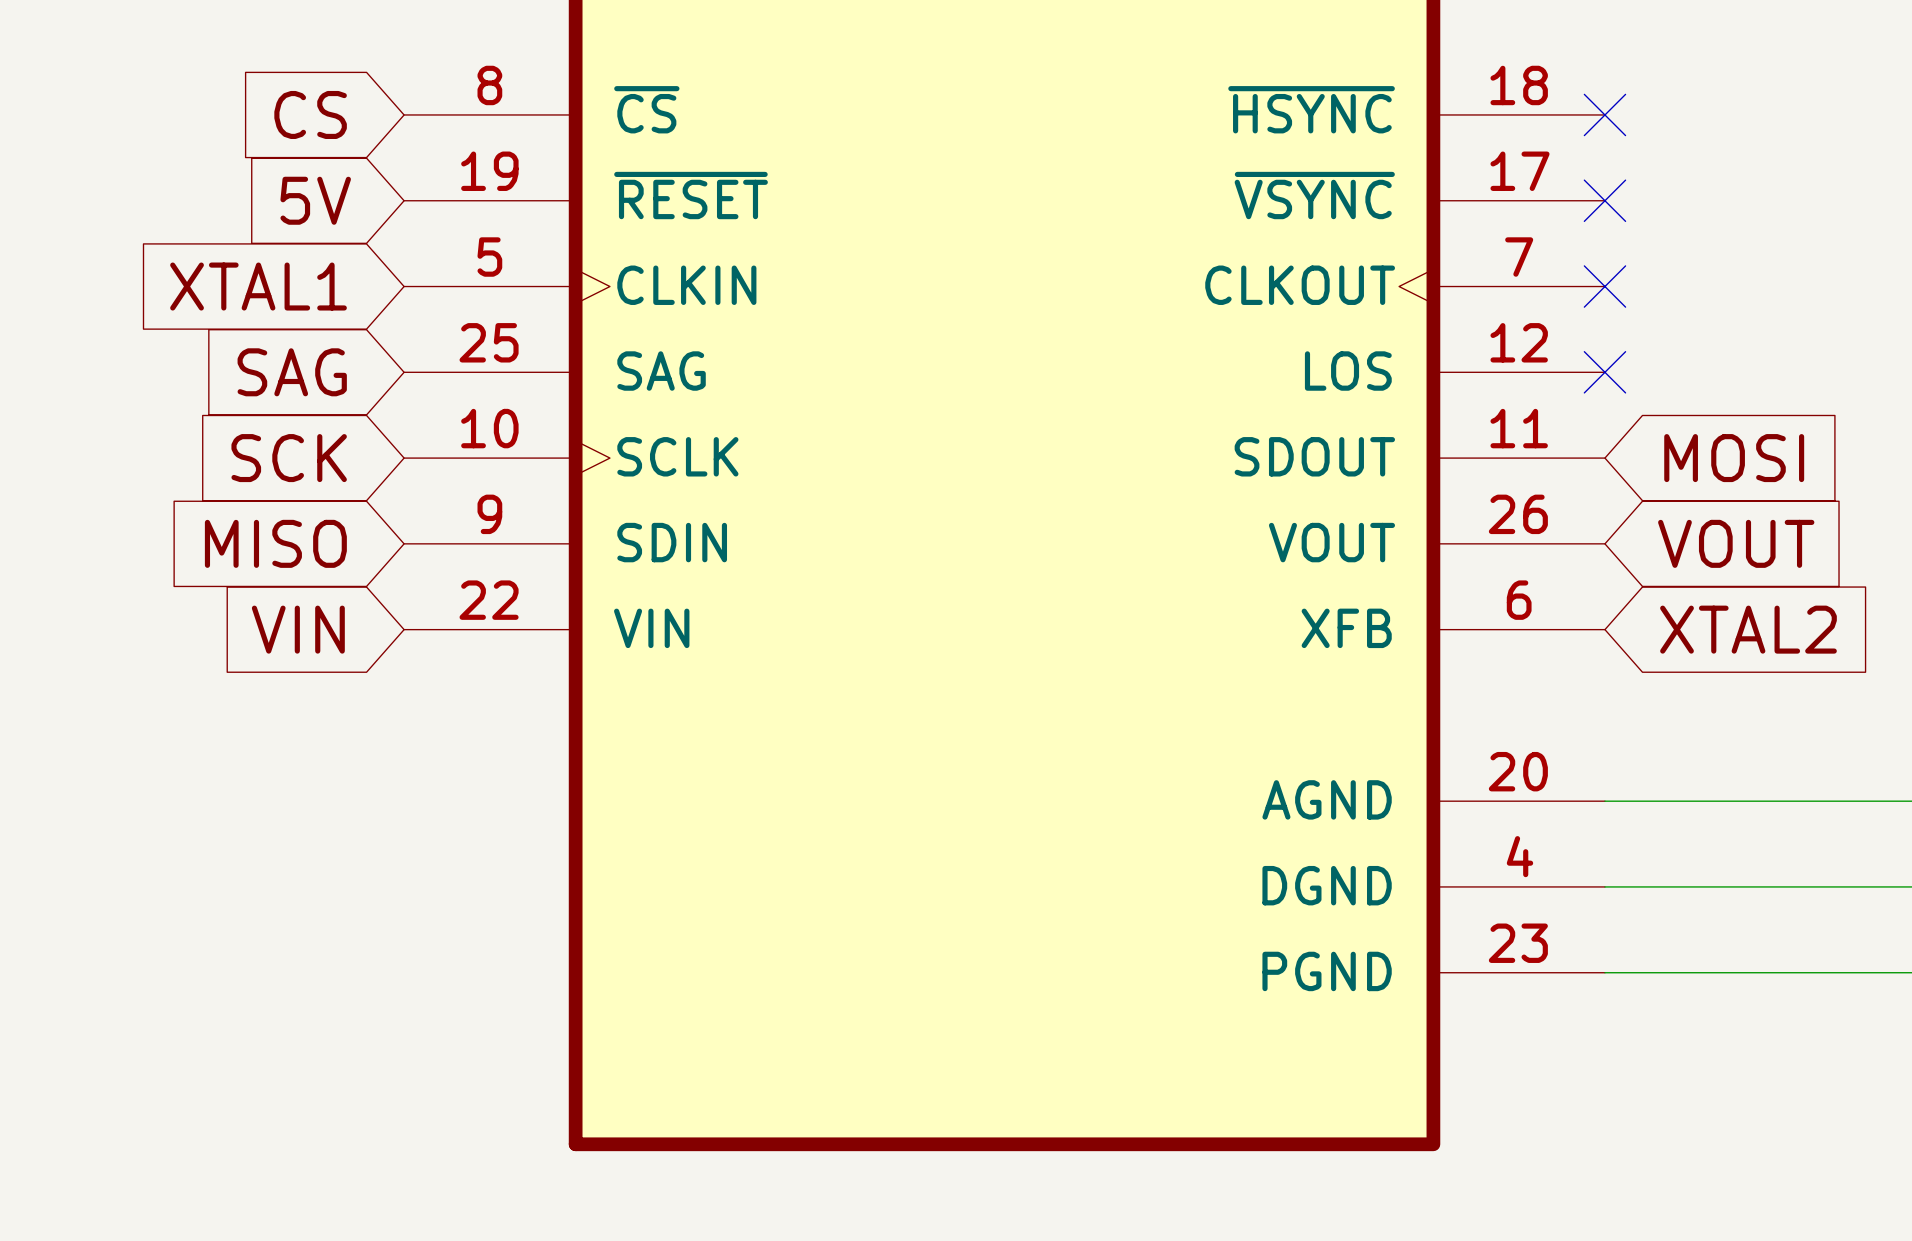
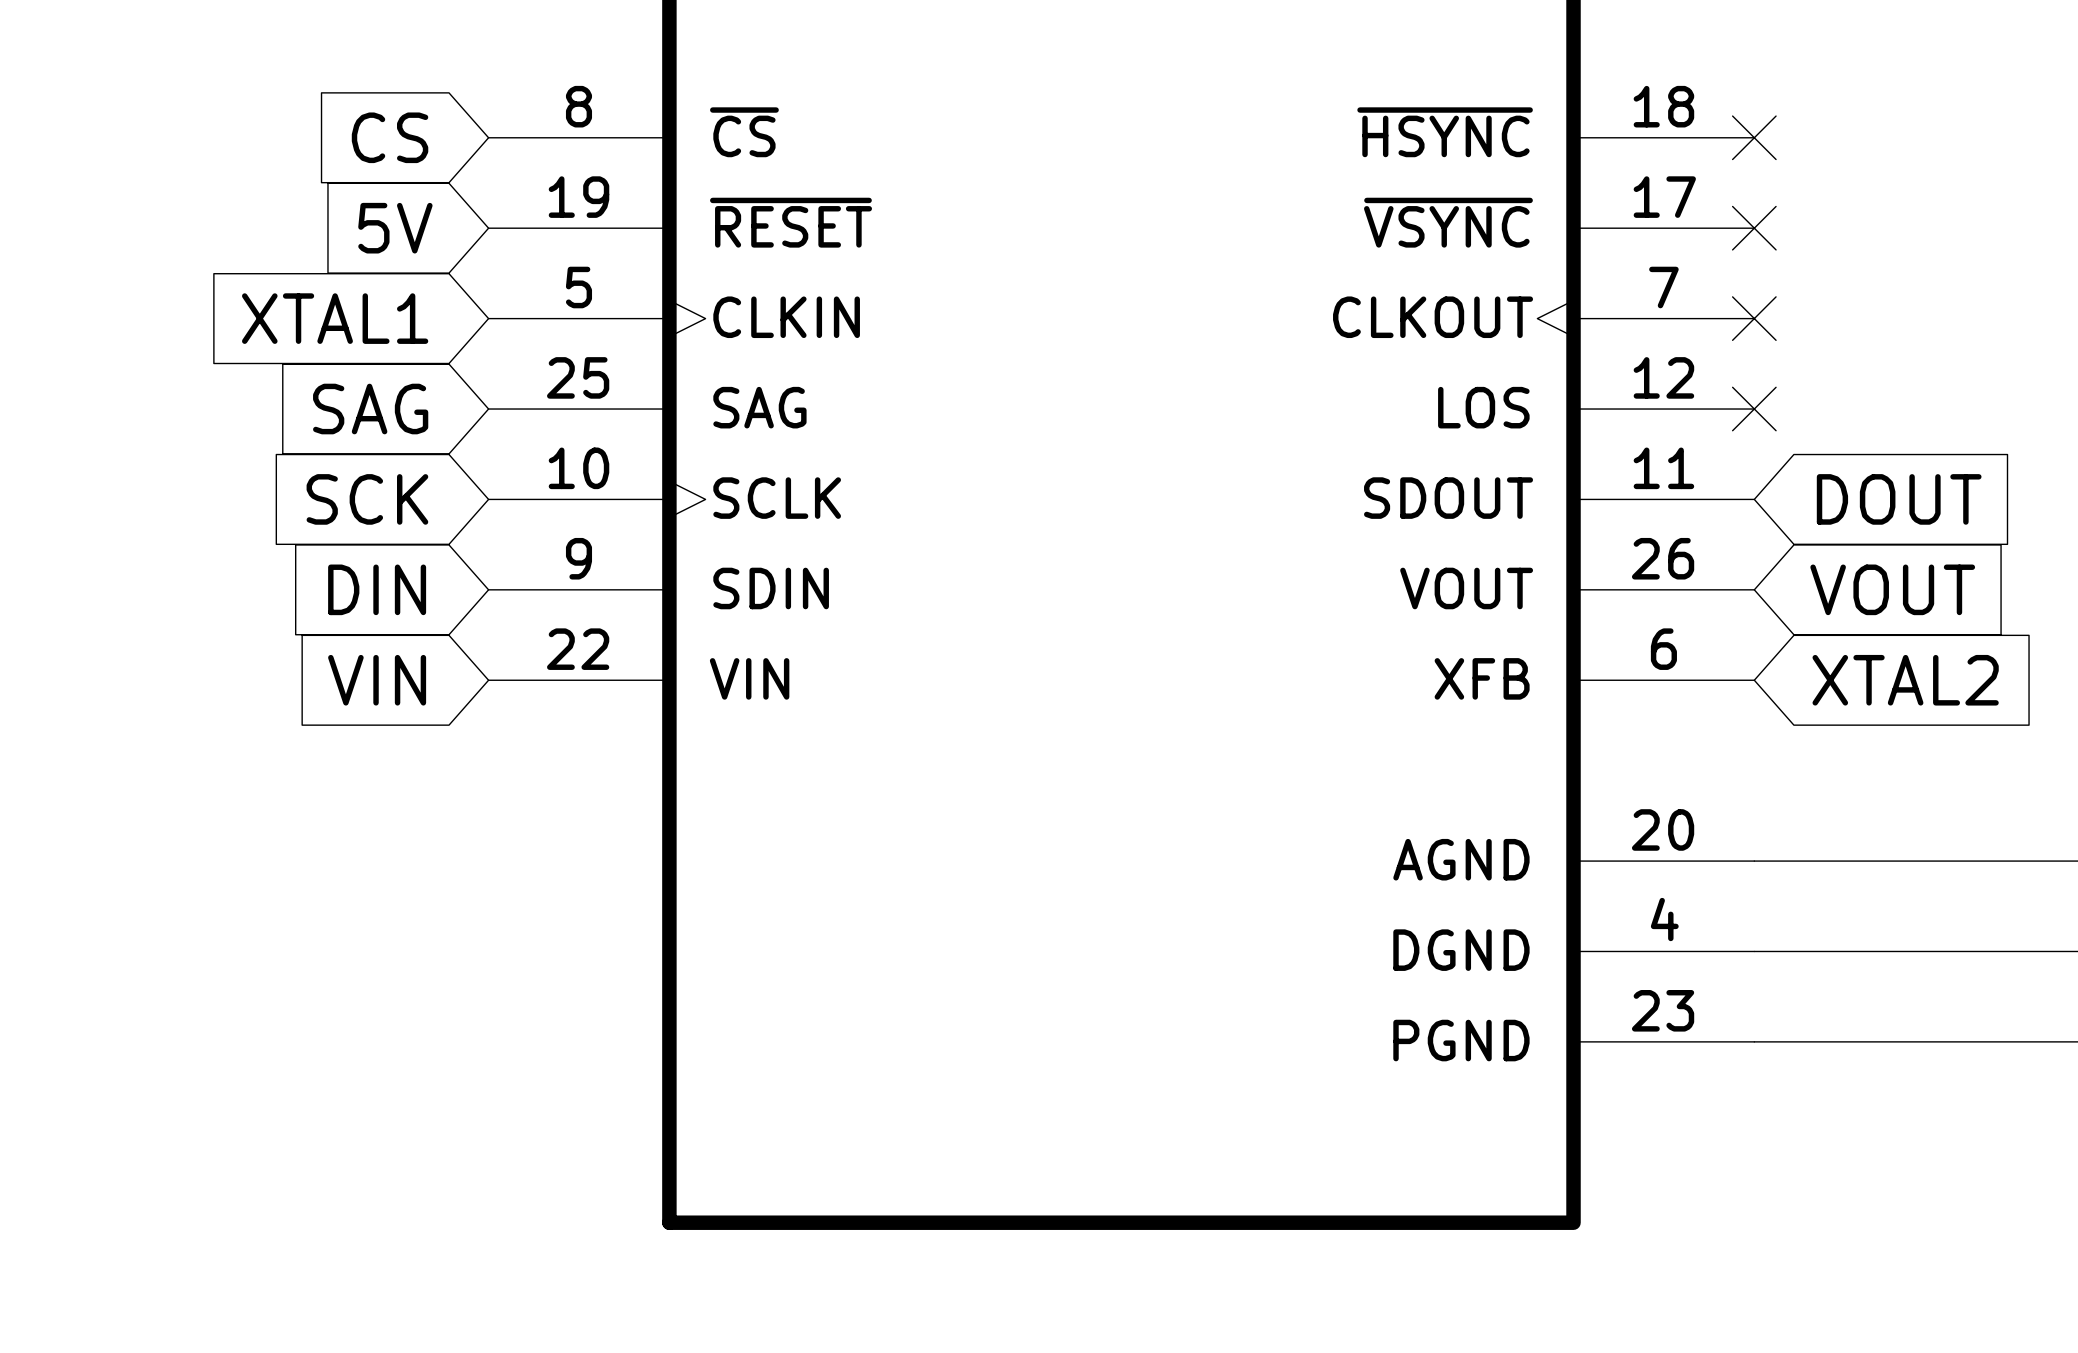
global label: MOSI (1734, 458) -> DOUT (1899, 499)
global label: MISO (275, 543) -> DIN (377, 589)

